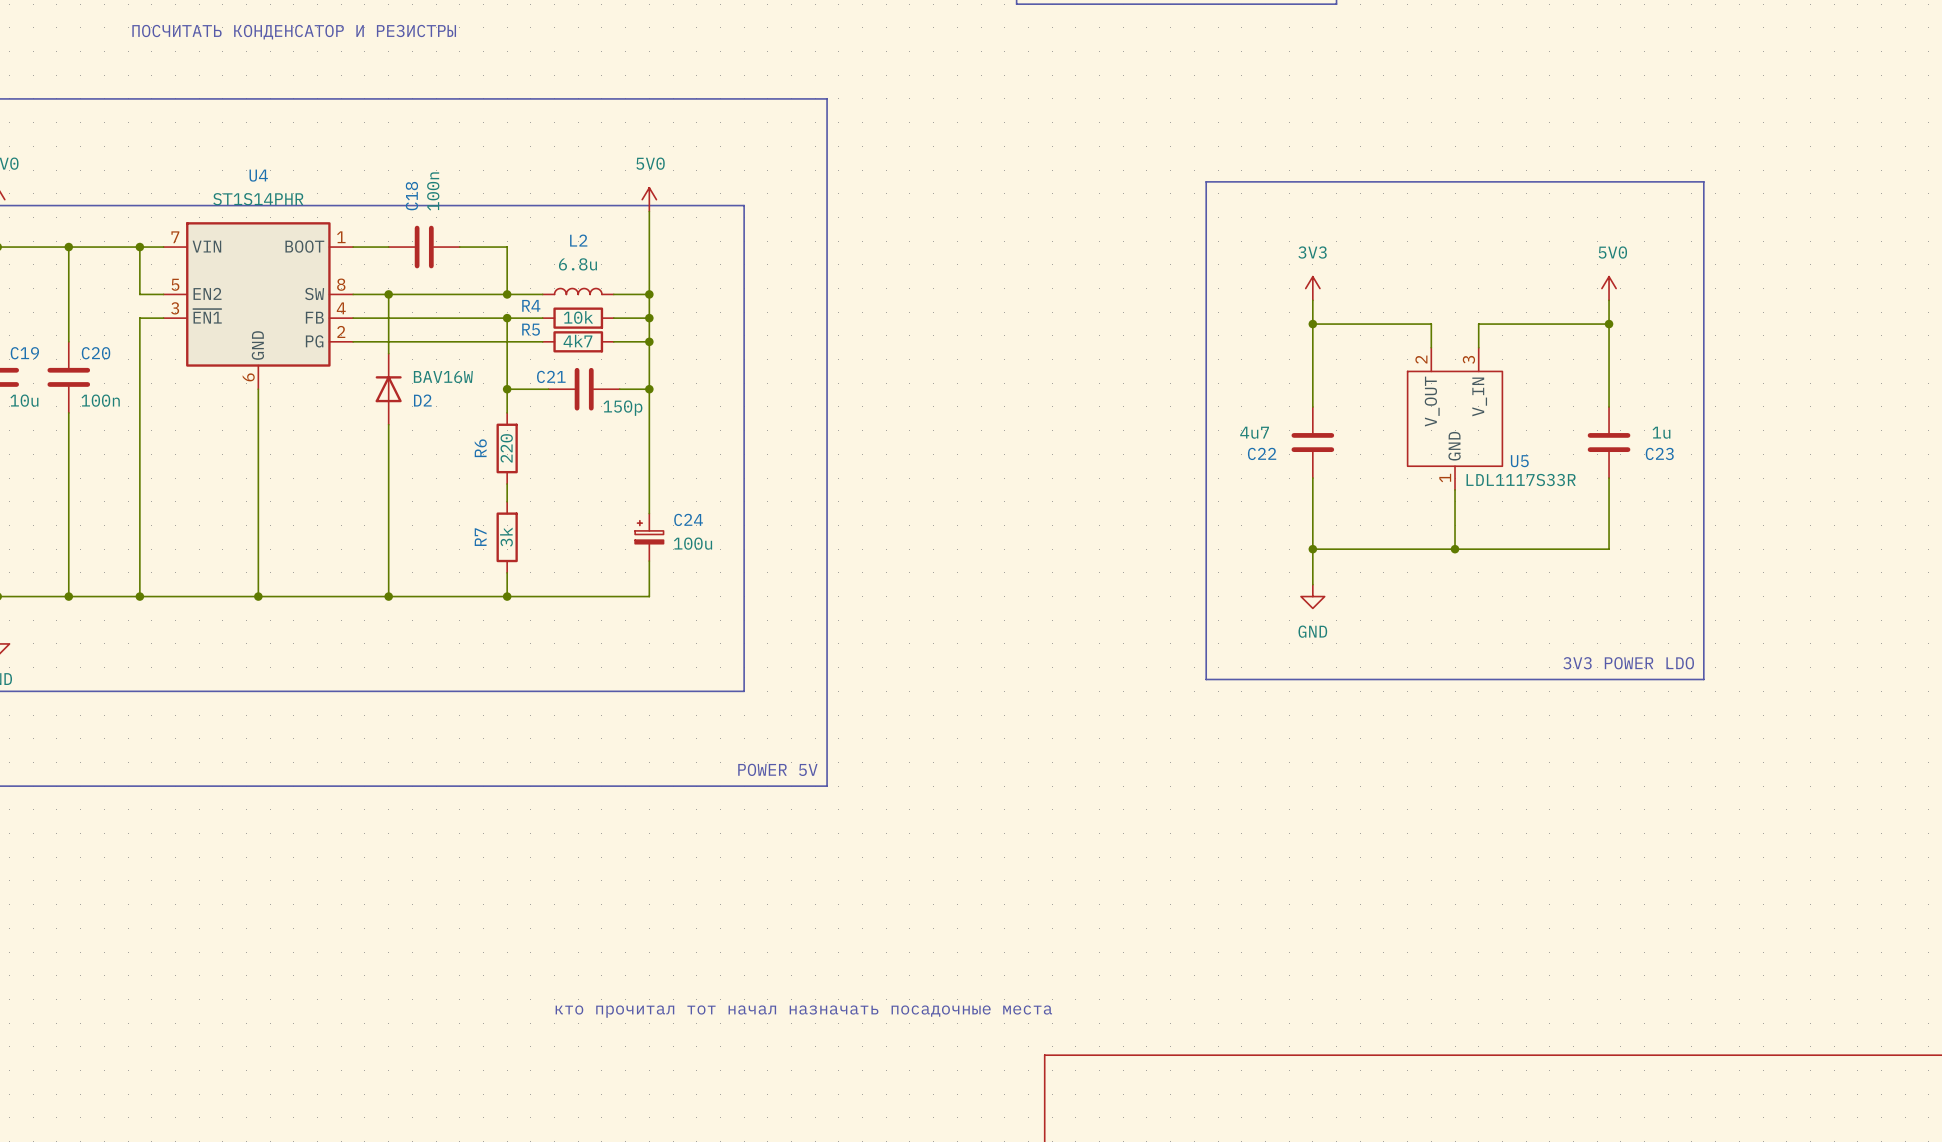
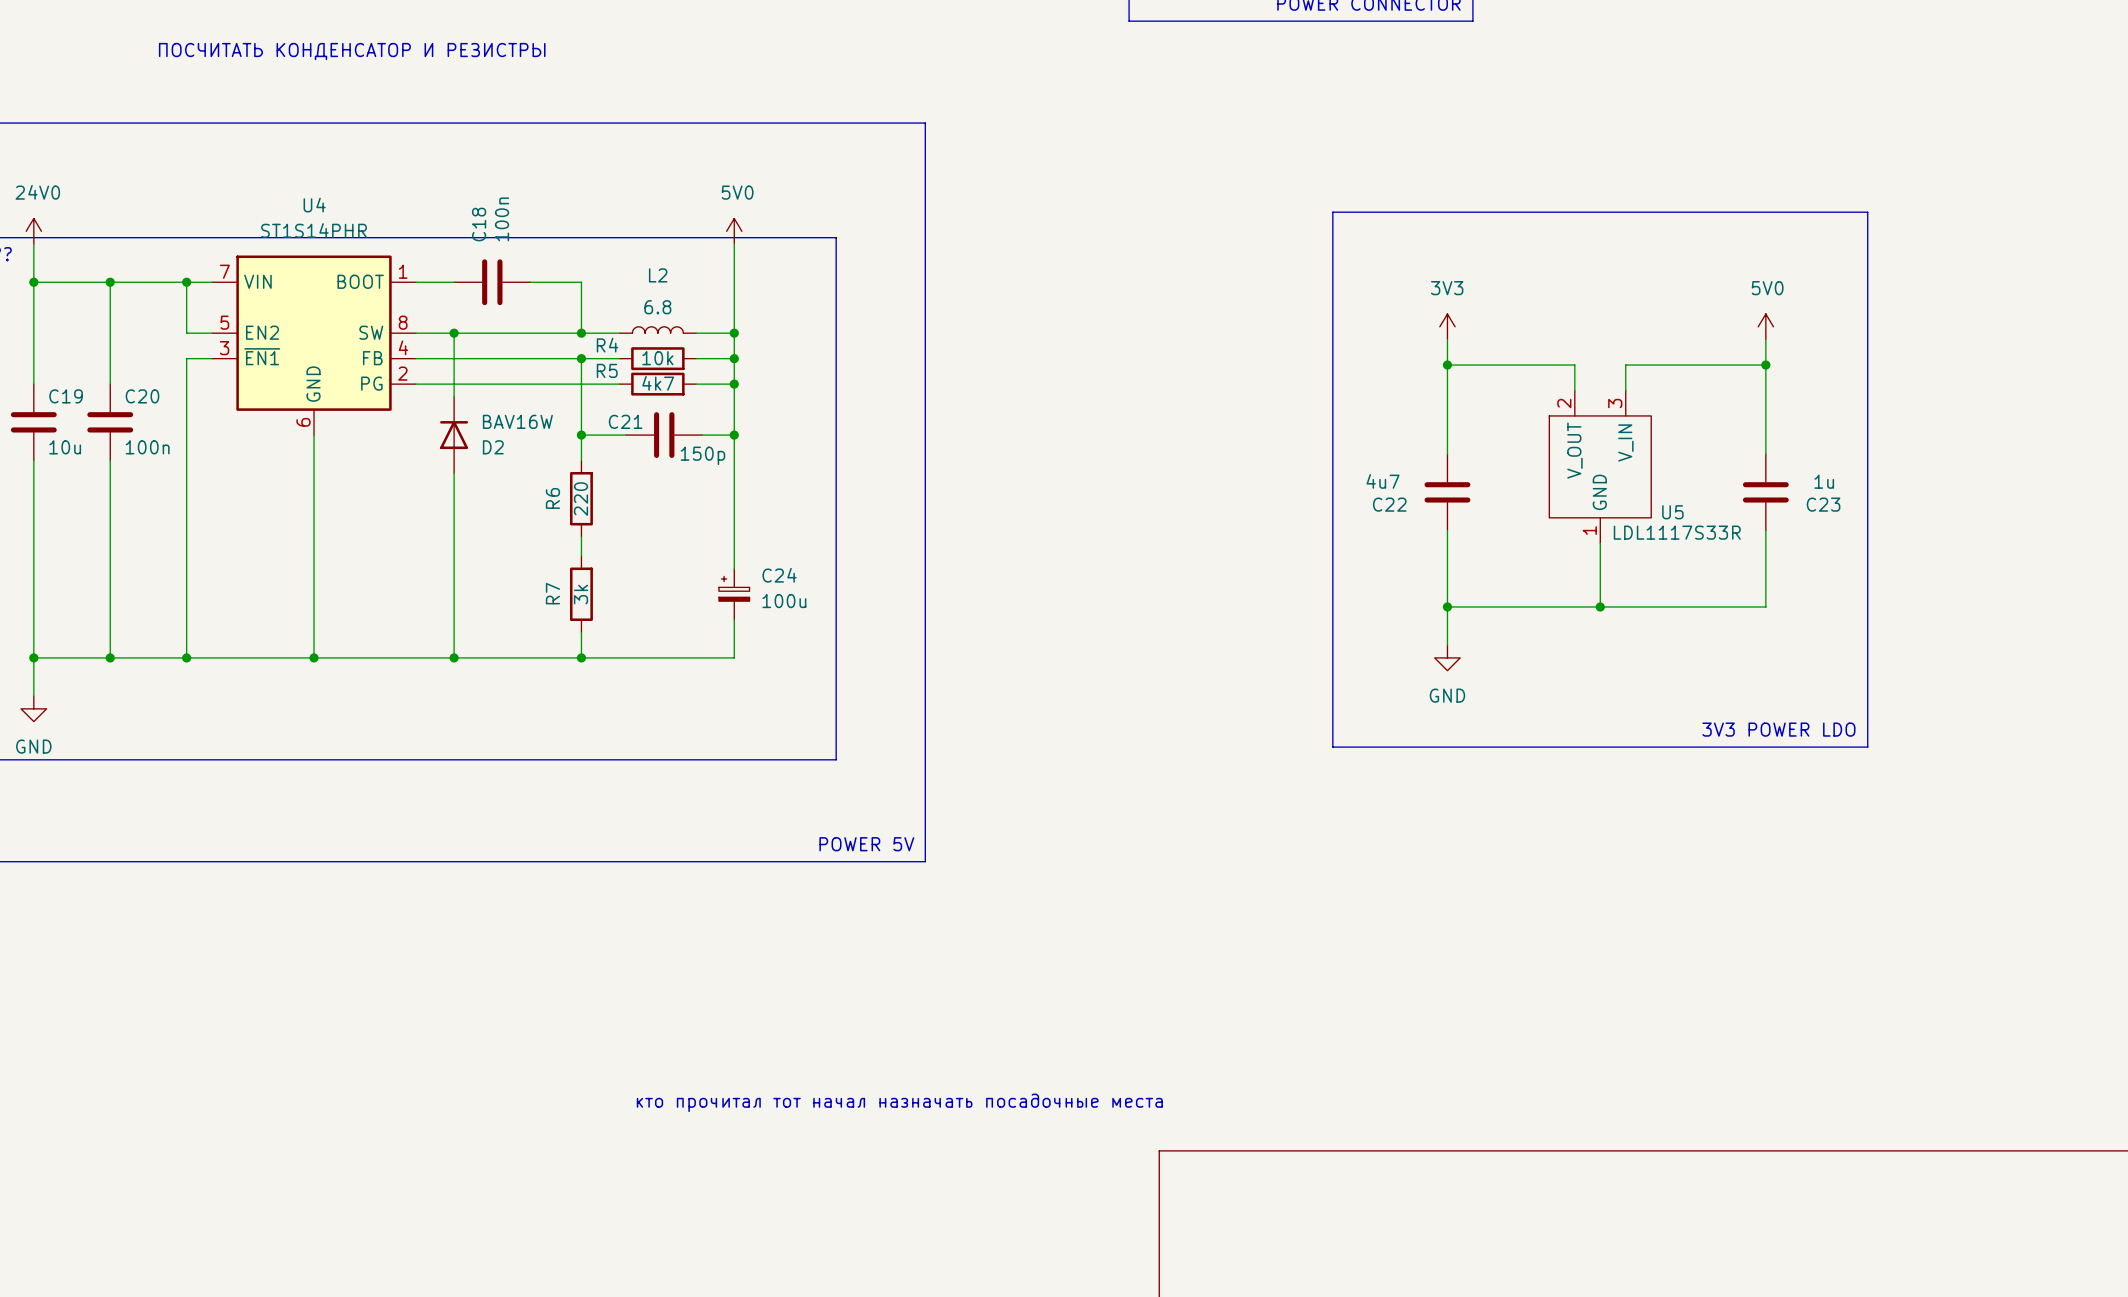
L2 value: 6.8u (577, 264) -> 6.8 (657, 307)

